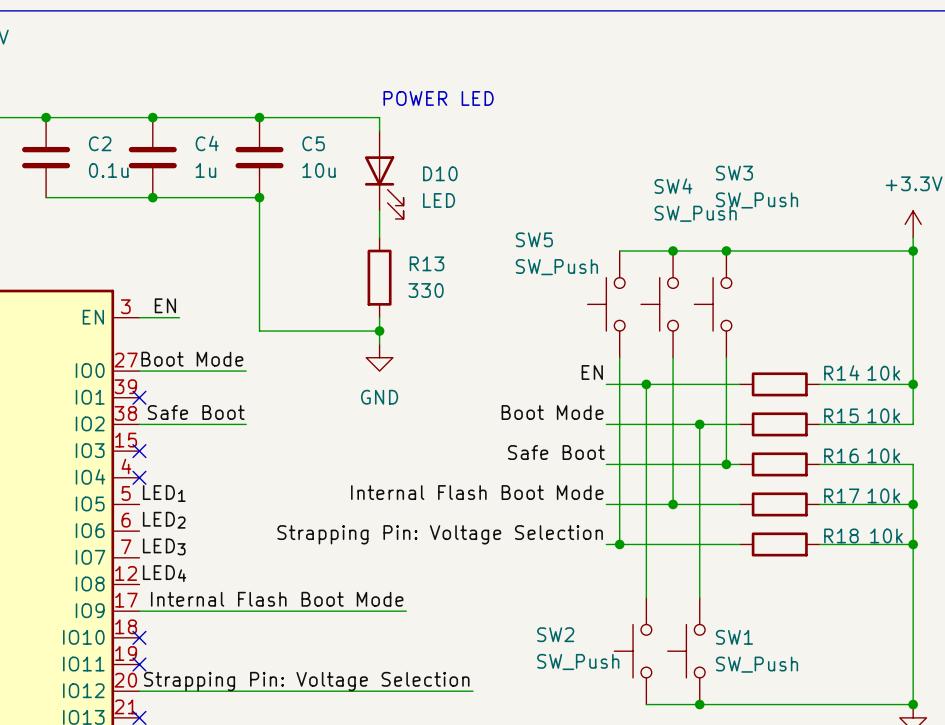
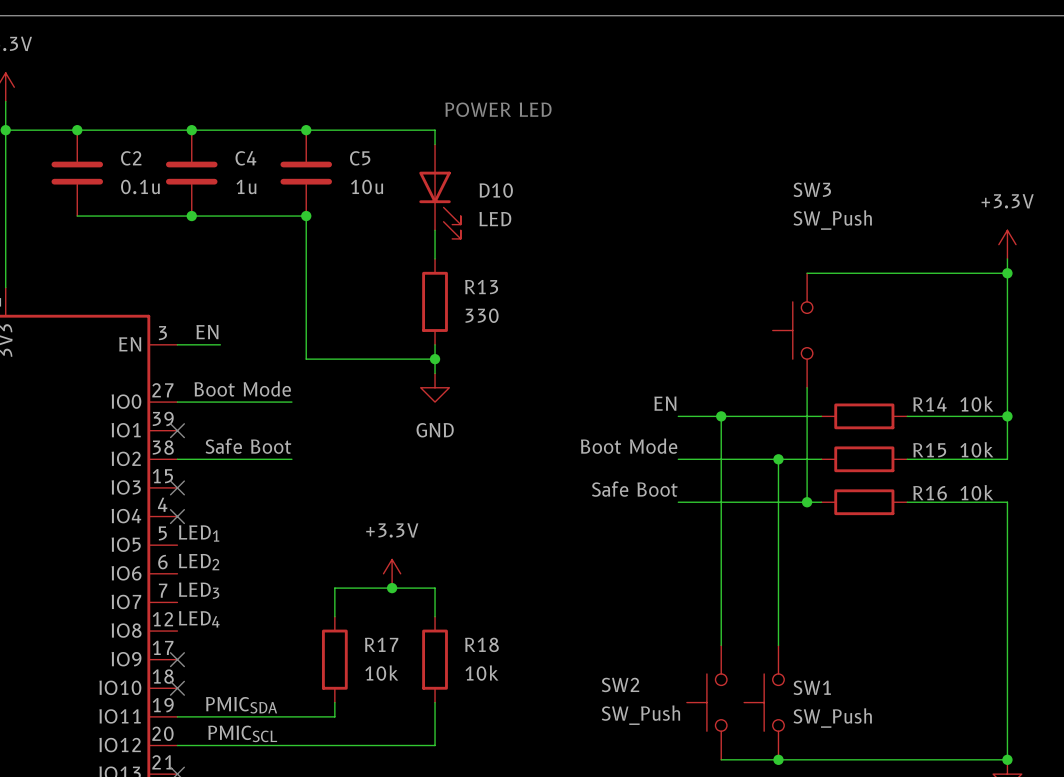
wire: (619, 251) (726, 251) -> none
junction: (673, 251) -> none
junction: (726, 251) -> none
SW5: SW_Push (606, 304) -> none
SW4: SW_Push (659, 304) -> none
wire: (619, 357) (619, 544) -> none
wire: (673, 357) (673, 504) -> none
label: Internal Flash Boot Mode (477, 492) -> none
R17 value position: 10k (883, 495) -> 10k (381, 673)
wire: (606, 504) (739, 504) -> none
junction: (673, 504) -> none
R17 rotation: 0° (779, 504) -> 90° clockwise (334, 659)
R17 position: (779, 504) -> (334, 659)
wire: (819, 504) (913, 504) -> none
junction: (913, 504) -> none
power symbol: none -> +3.3V (392, 573)
label: Strapping Pin: Voltage Selection (440, 534) -> none
R18 value position: 10k (886, 535) -> 10k (481, 673)
junction: none -> (392, 588)
wire: (606, 544) (739, 544) -> none
junction: (619, 544) -> none
R18 rotation: 0° (779, 544) -> 90° clockwise (435, 659)
R18 position: (779, 544) -> (435, 659)
wire: (819, 544) (913, 544) -> none
junction: (913, 544) -> none
wire: none -> (334, 616) (334, 588) (435, 588) (435, 616)
label: Internal Flash Boot Mode (277, 599) -> none
wire: (139, 611) (406, 611) -> none
wire: none -> (334, 702) (334, 716) (177, 716)
label: none -> PMICSDA (241, 705)
no-connect mark position: (139, 664) -> (177, 659)
label: none -> PMICSCL (242, 733)
label: Strapping Pin: Voltage Selection (306, 681) -> none
wire: (379, 691) (472, 691) -> (435, 745) (435, 702)

